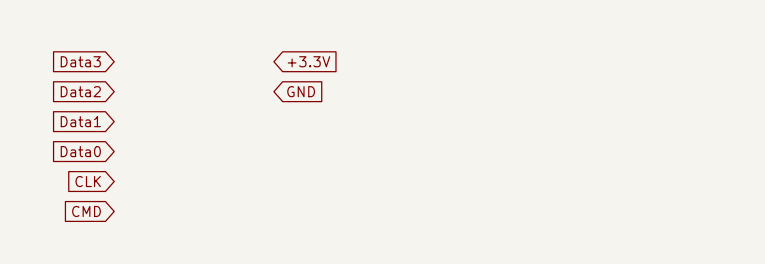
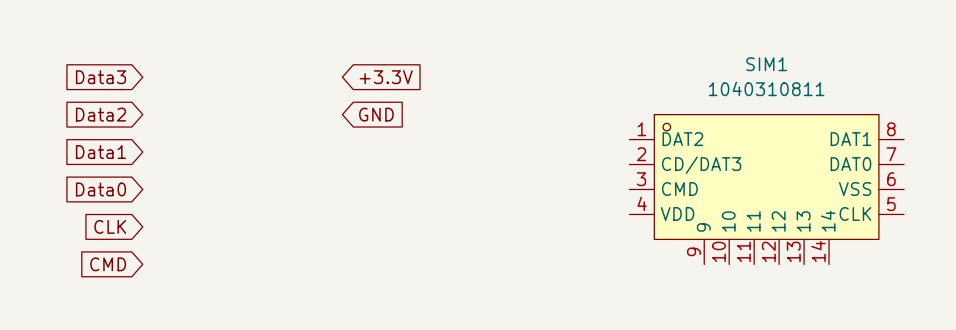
SIM1: none -> 1040310811 (766, 189)

